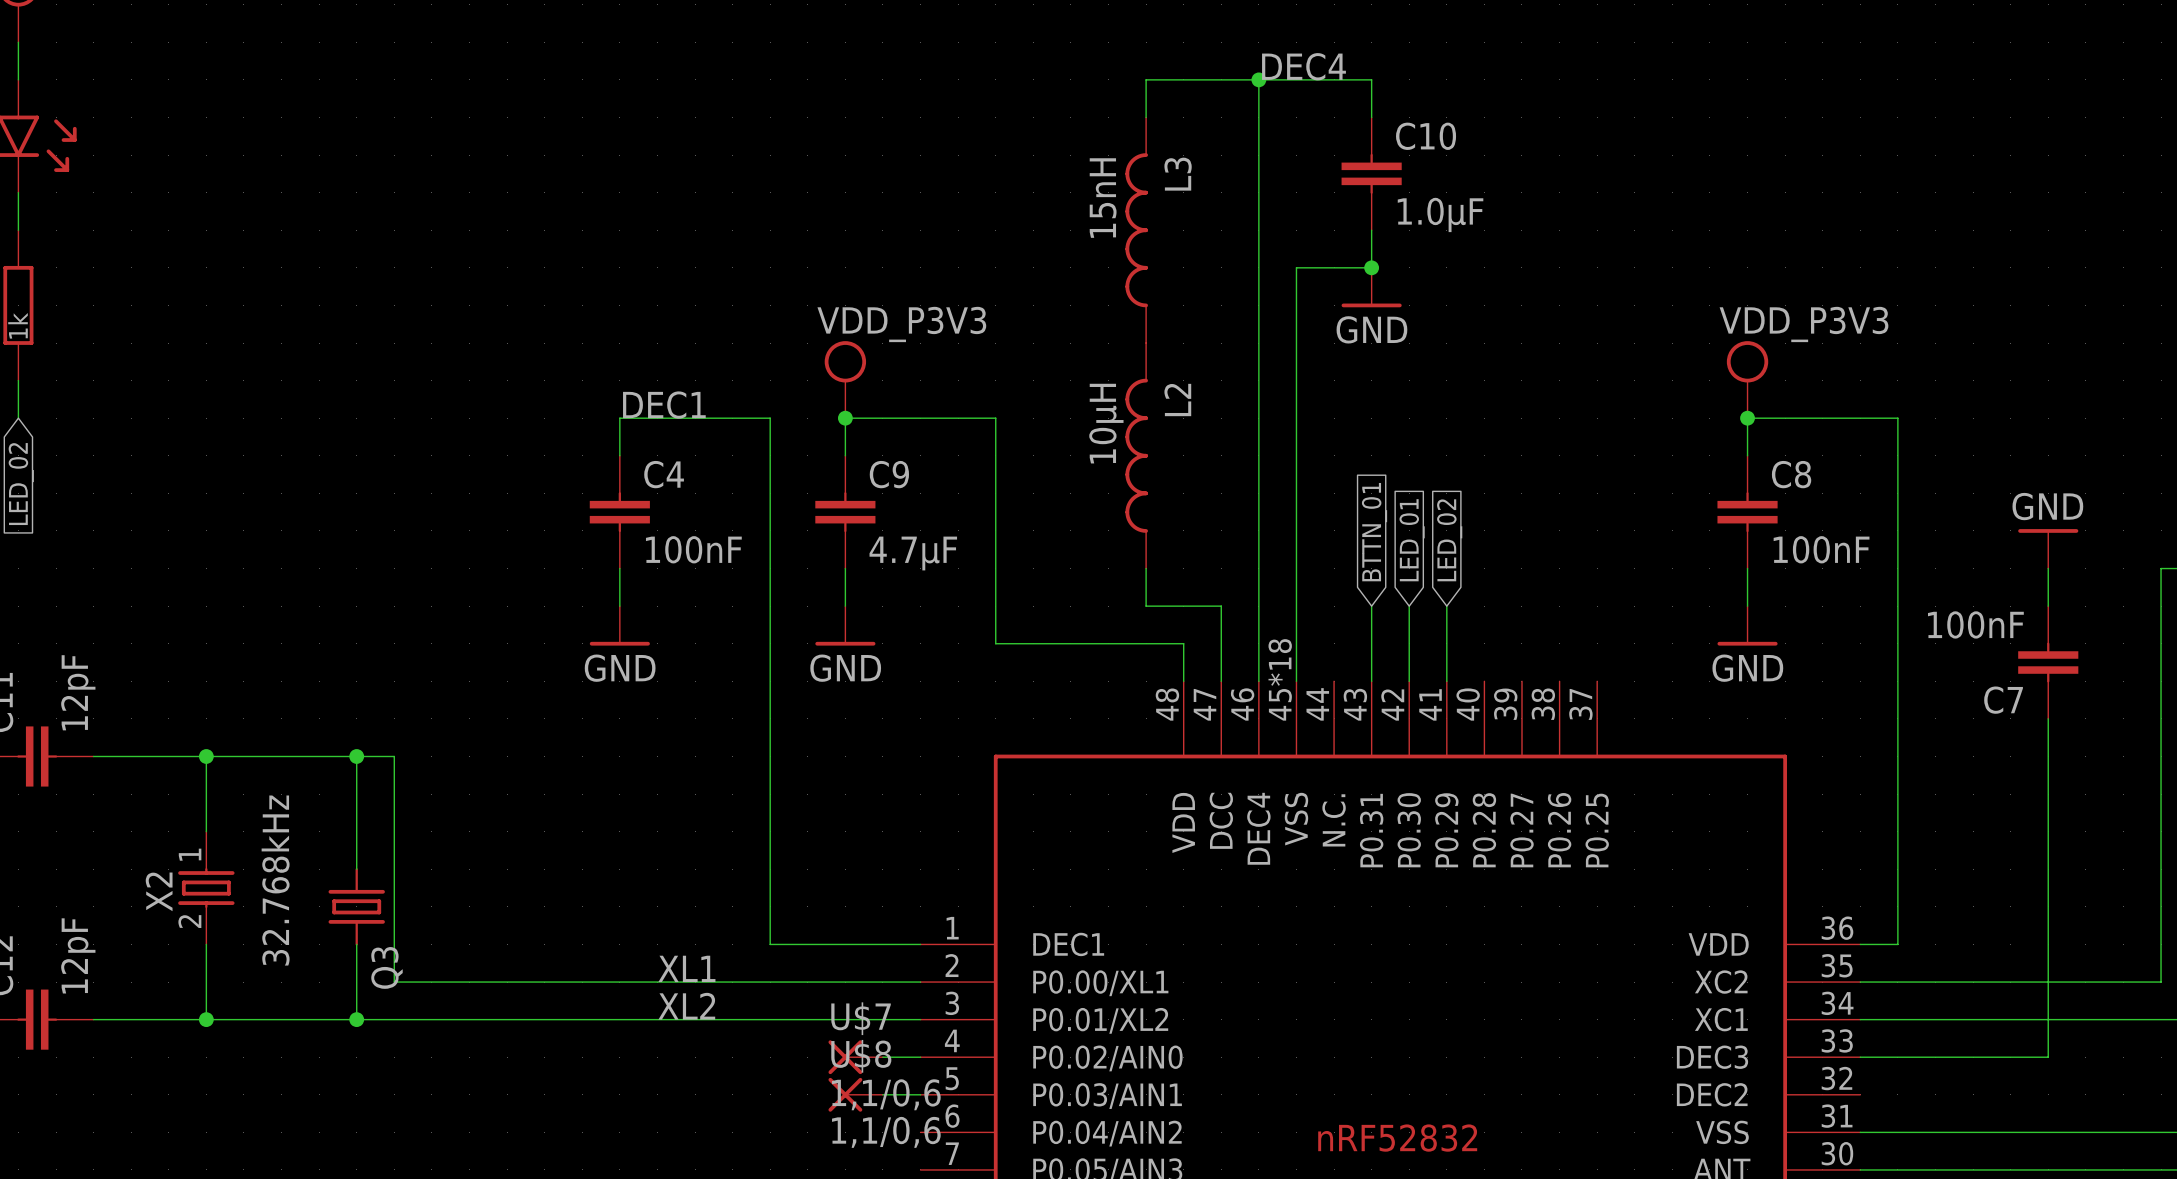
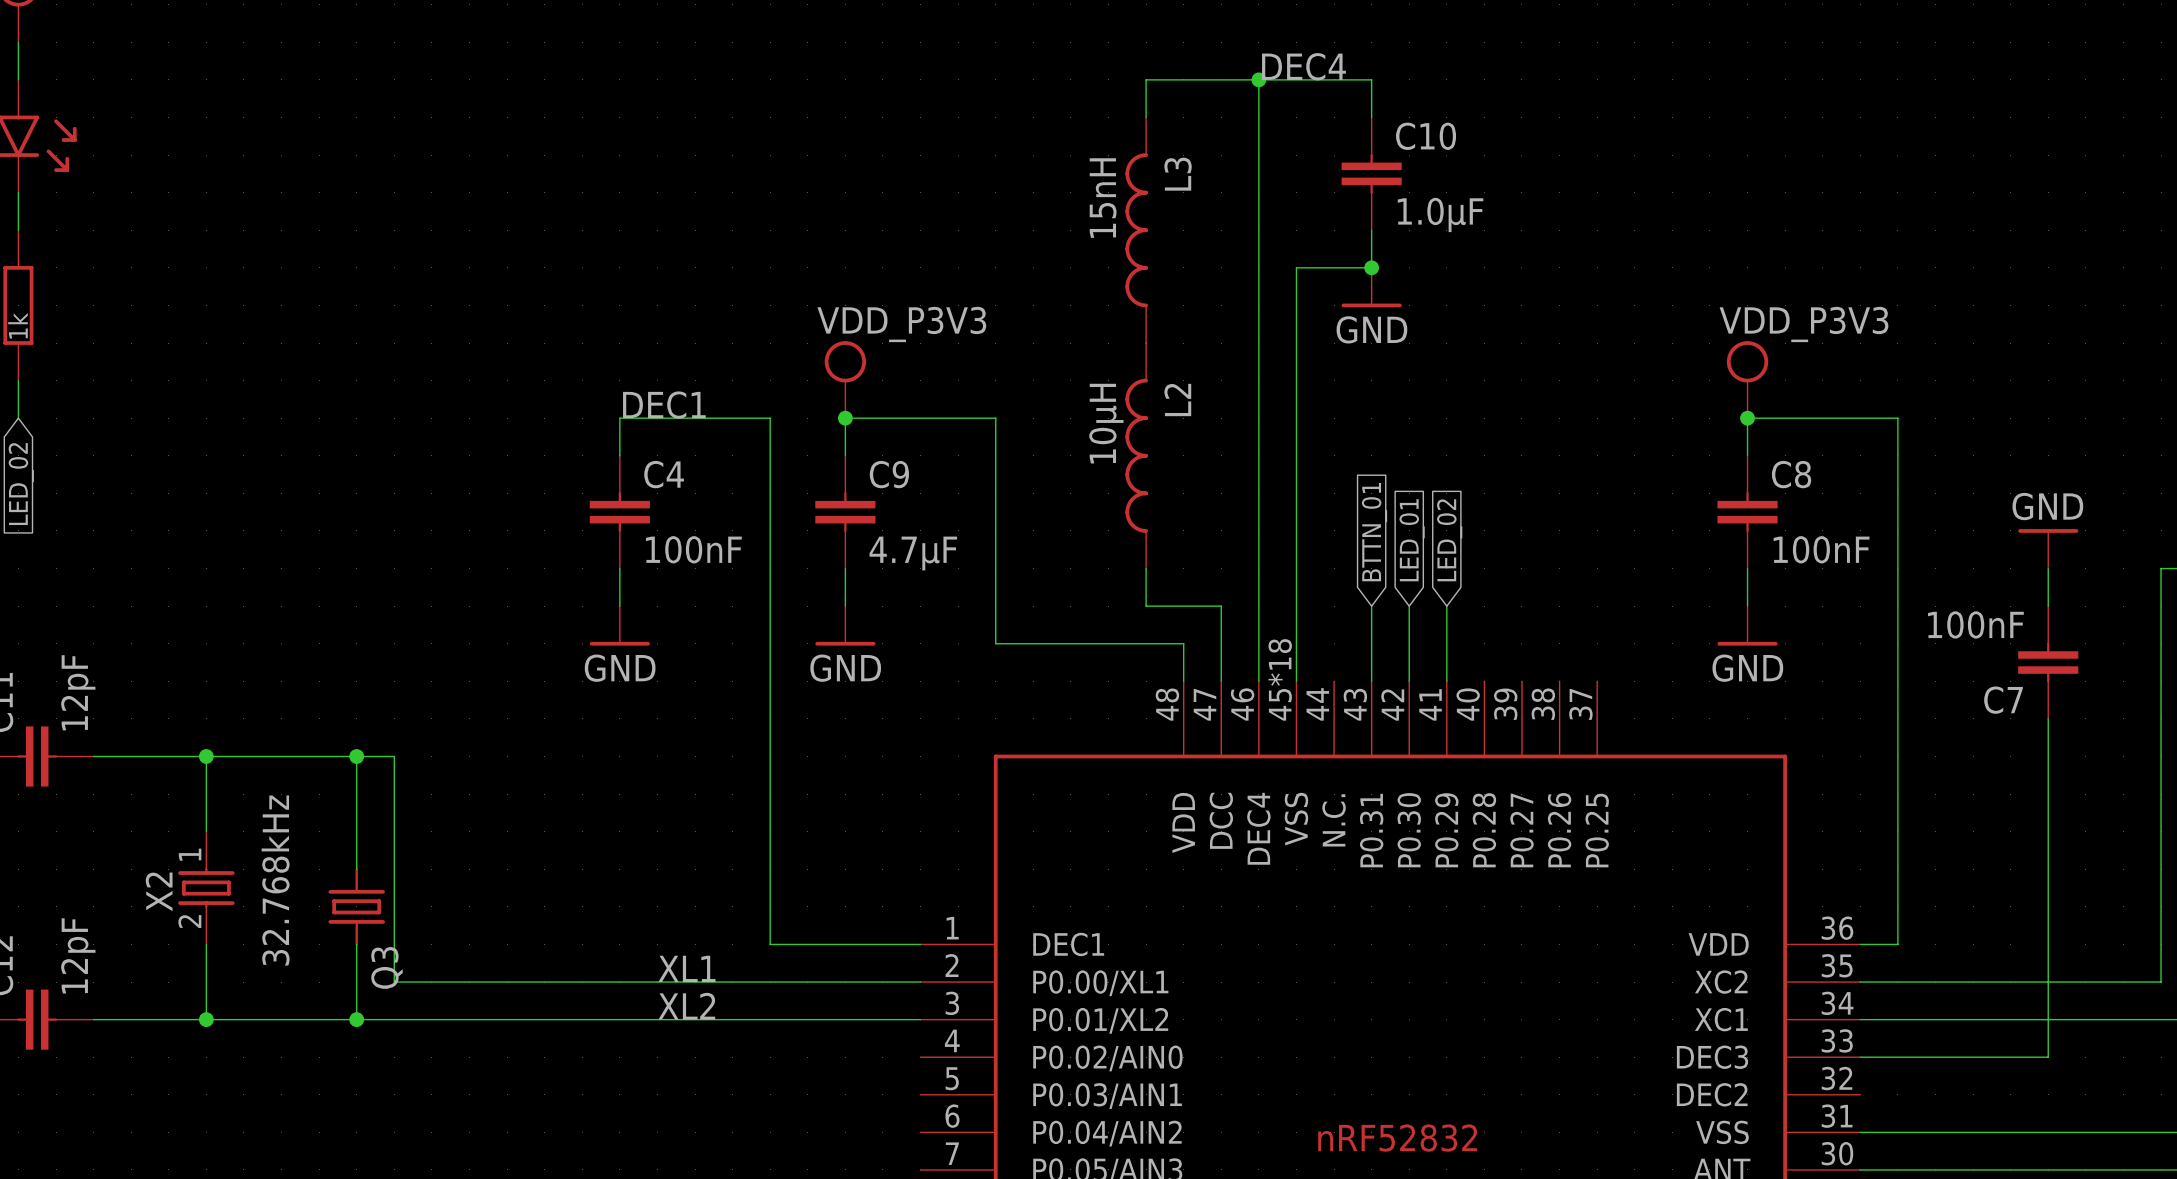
U$7: 1,1/0,6 (855, 1057) -> none
wire: (882, 1057) (920, 1057) -> none
U$8: 1,1/0,6 (855, 1094) -> none
wire: (882, 1094) (920, 1094) -> none

